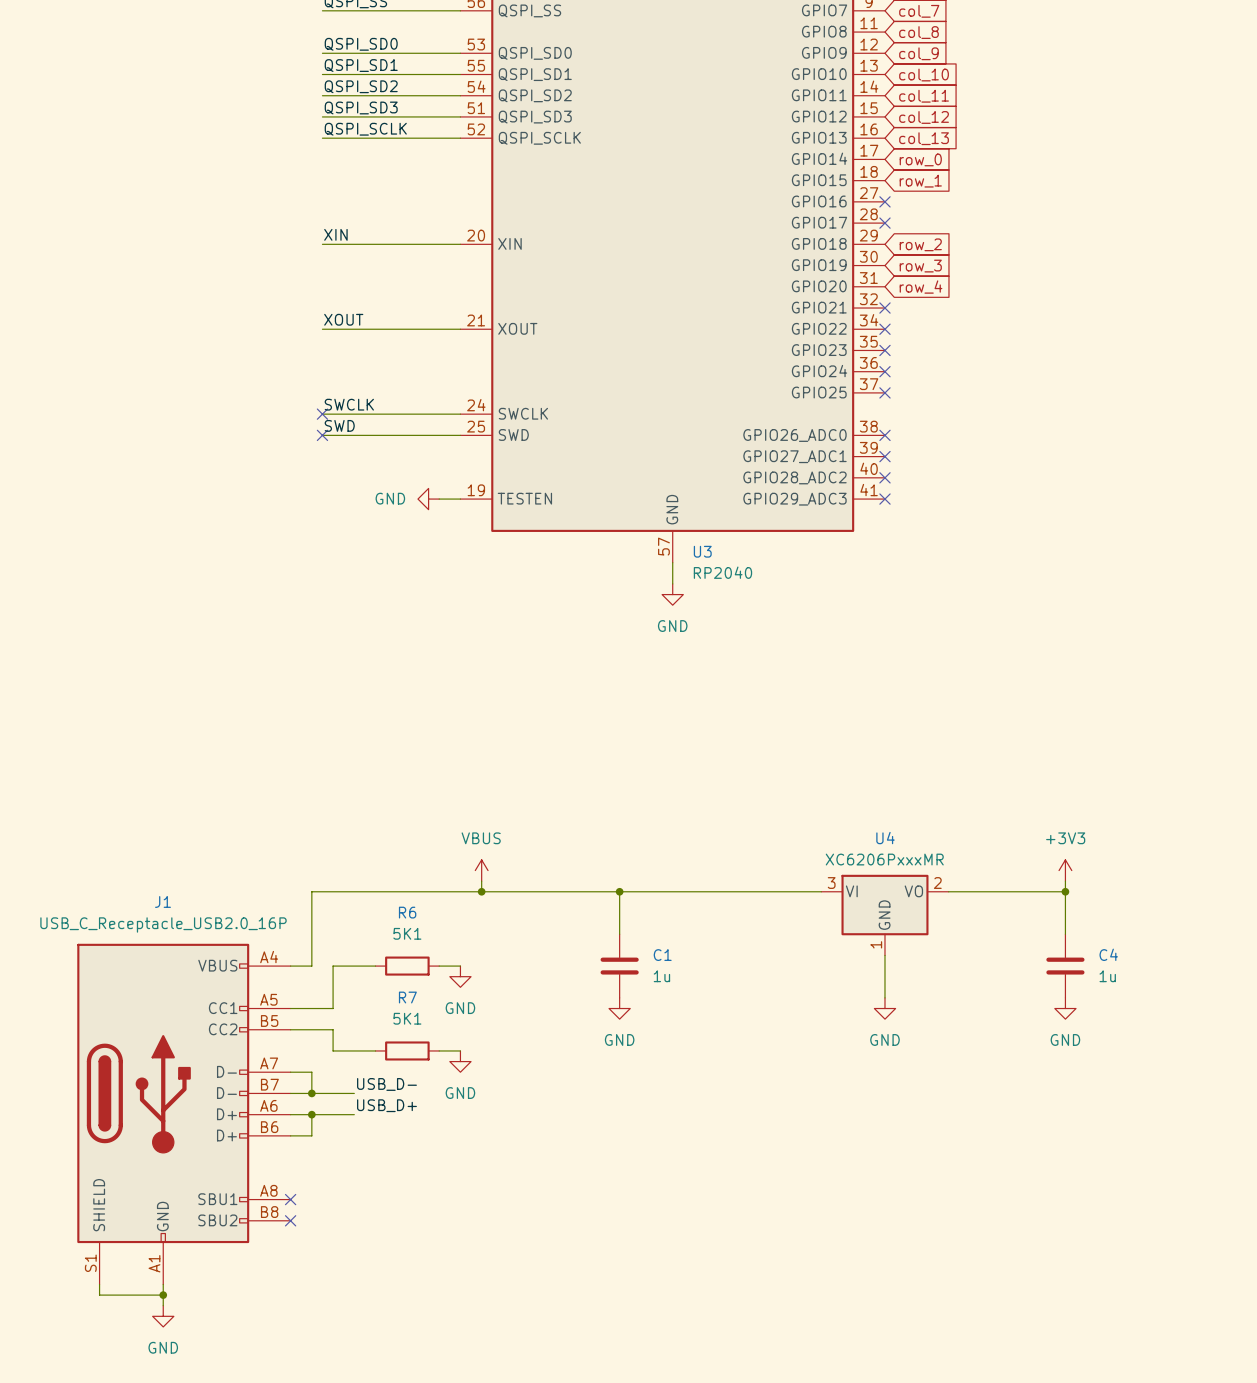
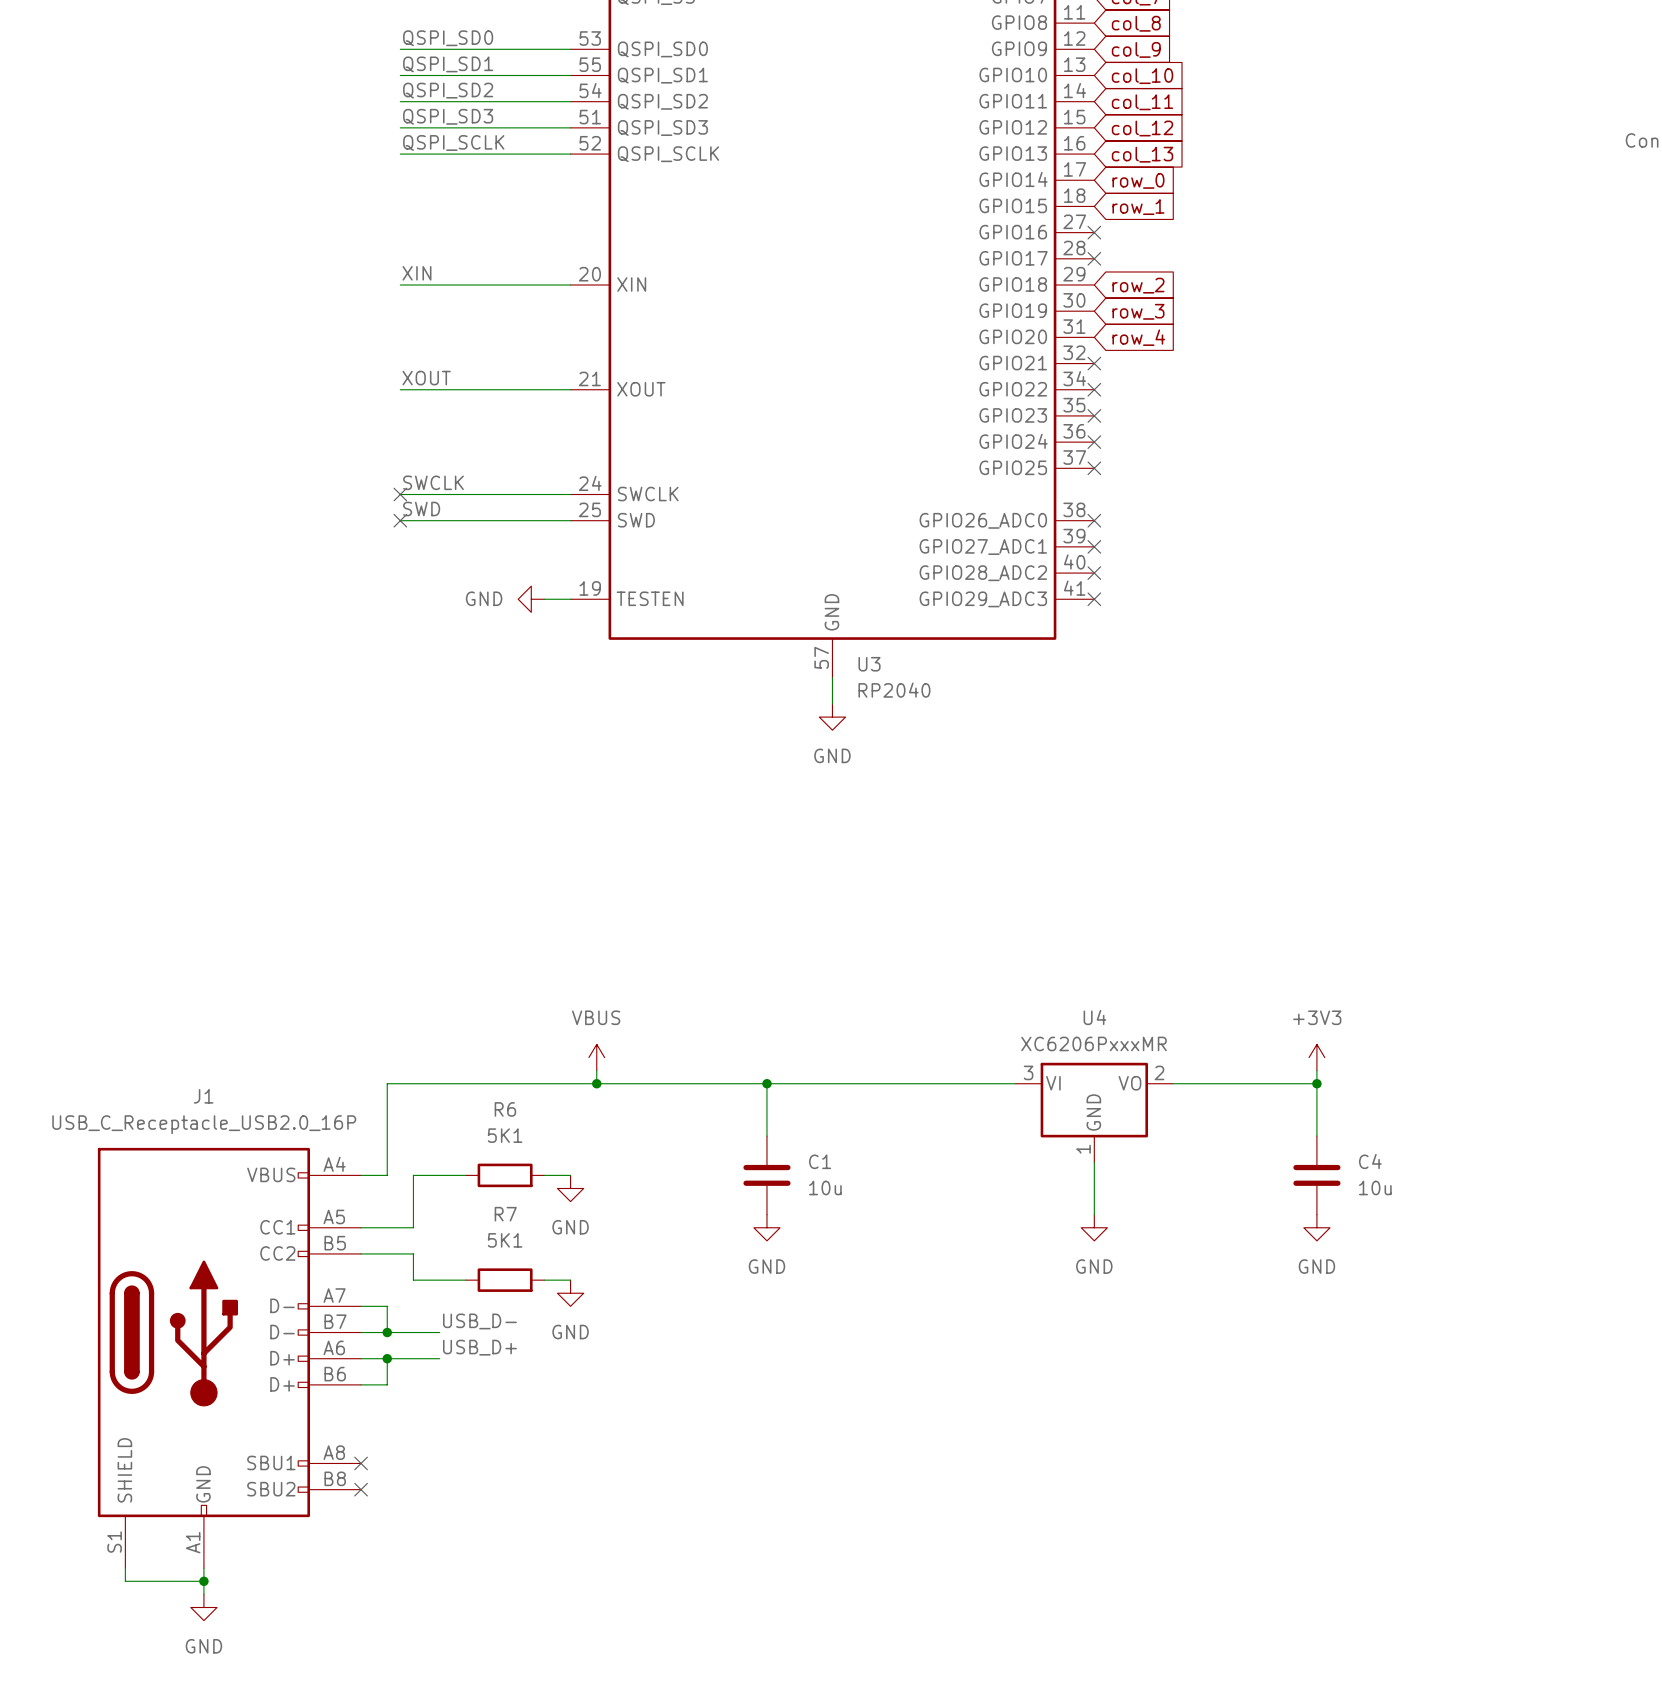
C1 value: 1u (661, 976) -> 10u (825, 1188)
C4 value: 1u (1107, 976) -> 10u (1375, 1188)

